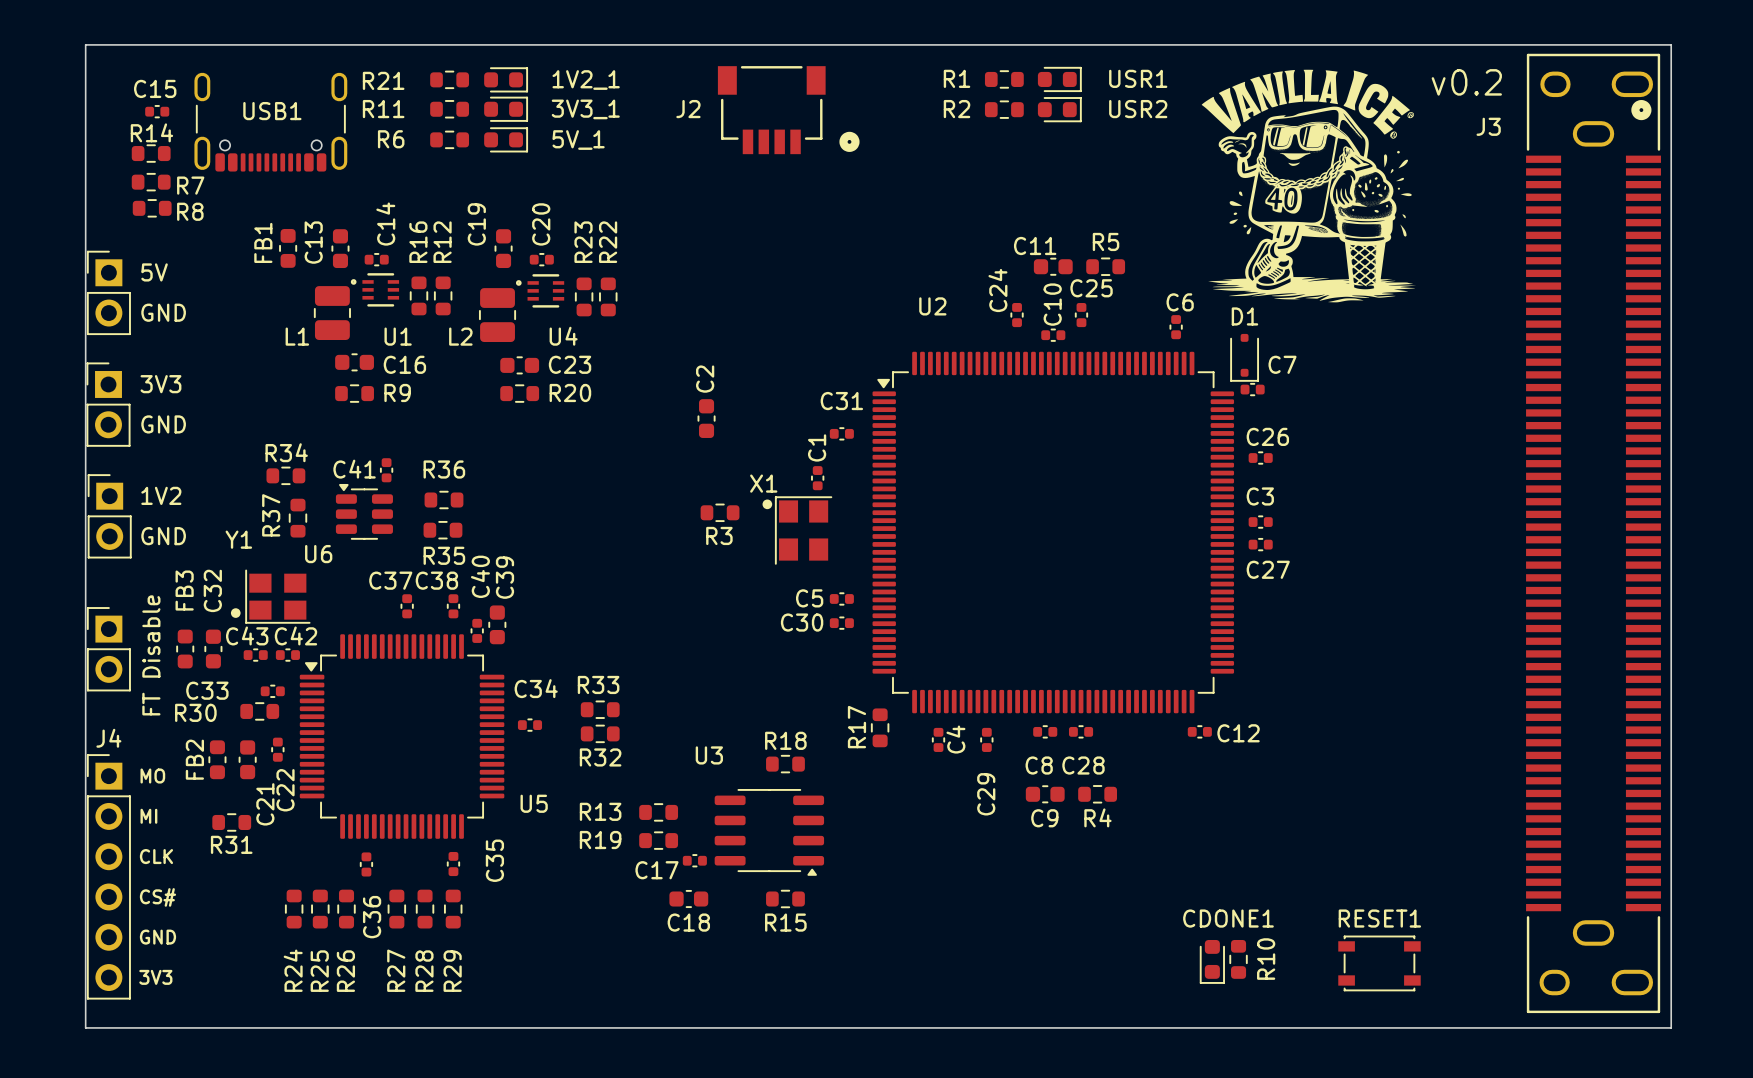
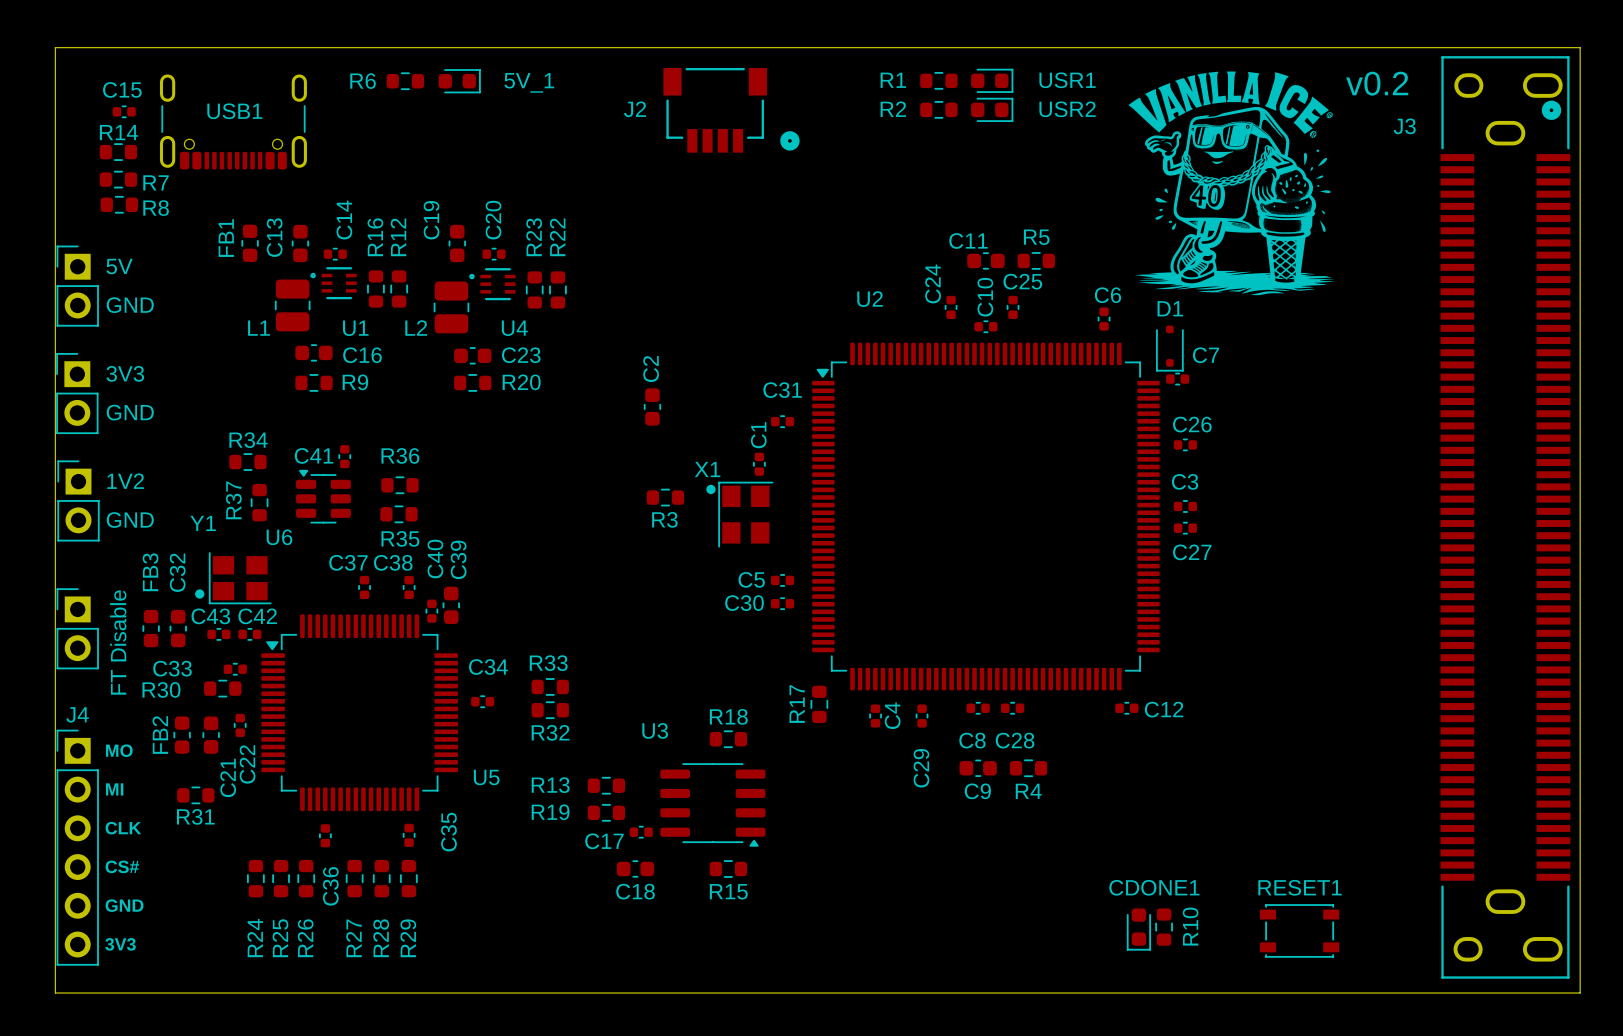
R21 name: R21 (383, 80) -> R6 (363, 81)
1V2_1 name: 1V2_1 (586, 80) -> 5V_1 (529, 82)
R11: (449, 109) -> none
3V3_1: (506, 109) -> none
R6: (449, 139) -> none
5V_1: (506, 139) -> none

